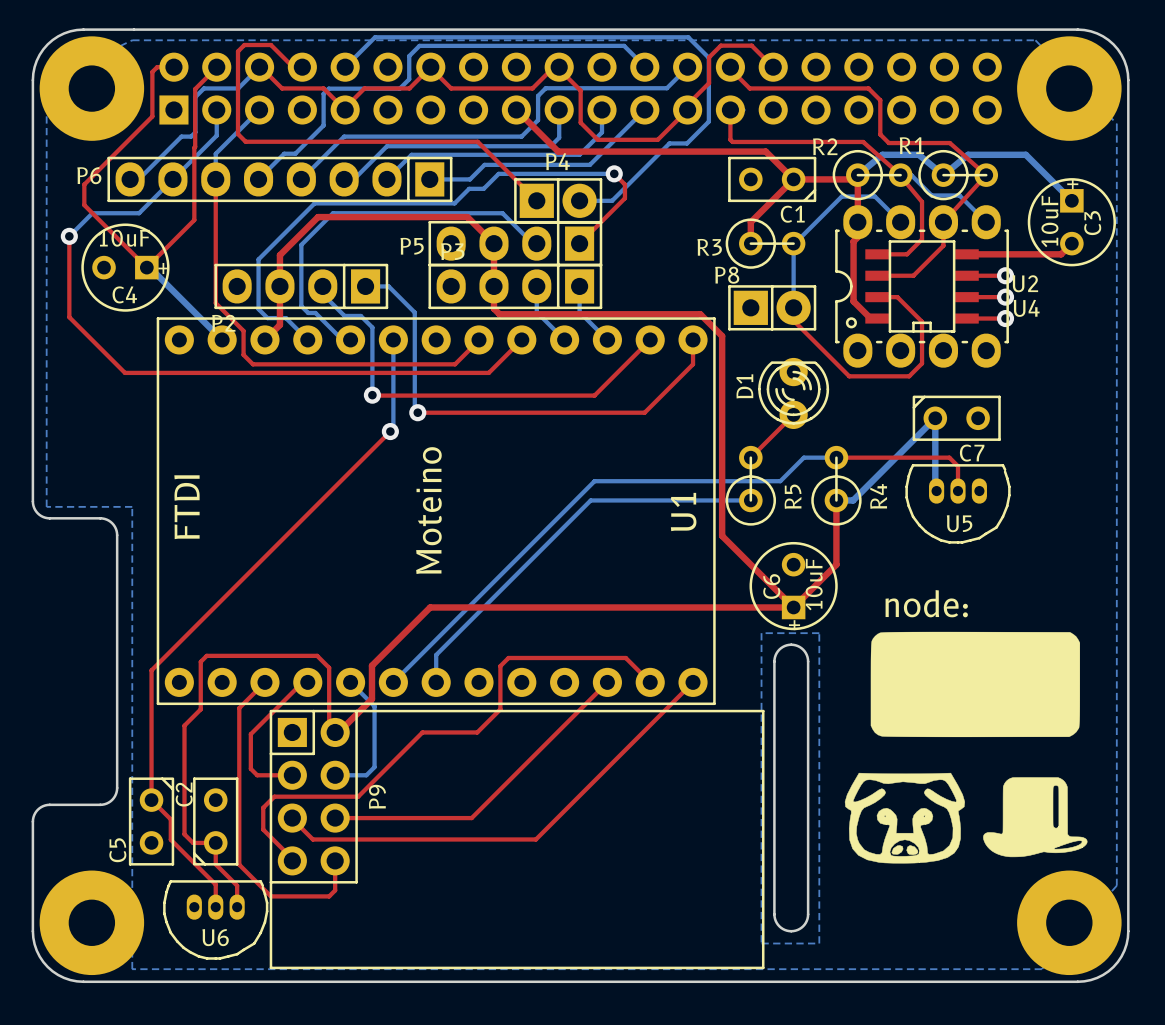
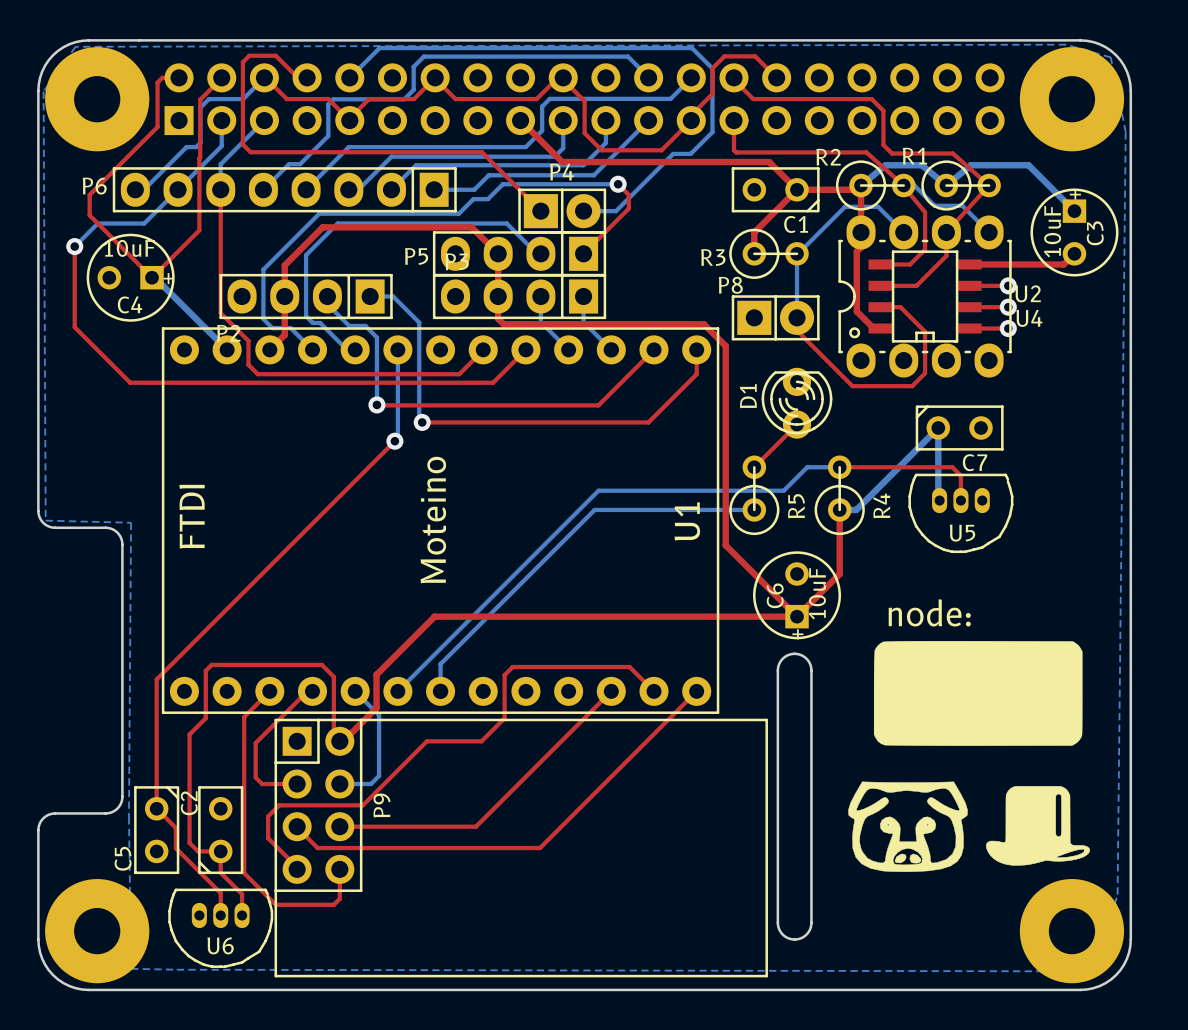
bottom zone outline: (132, 40) (46, 80) (46, 506) (132, 506) (132, 969) (1041, 969) (1116, 885) (1116, 123) (1035, 40) (132, 40) -> (1065, 44) (75, 46) (43, 91) (45, 520) (131, 522) (128, 817) (131, 968) (1094, 971) (1117, 894) (1125, 132) (1110, 57) (1065, 44)
bottom zone outline: (761, 633) (819, 633) (819, 943) (761, 943) (761, 633) -> none

